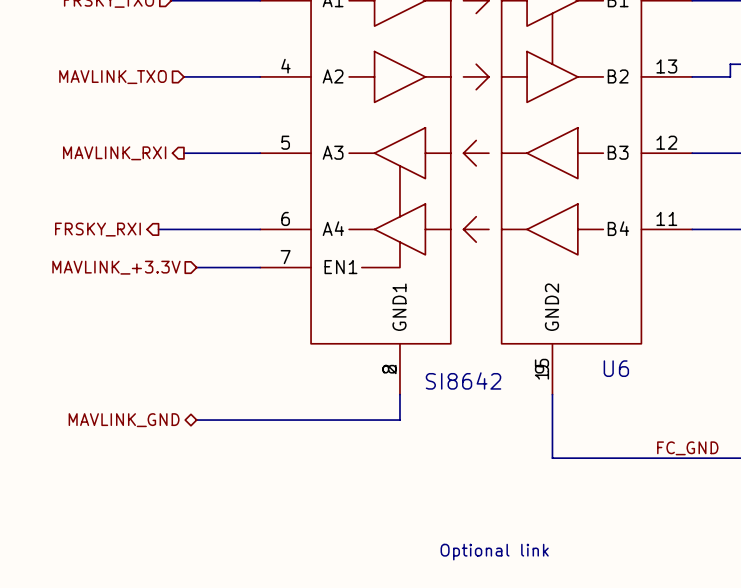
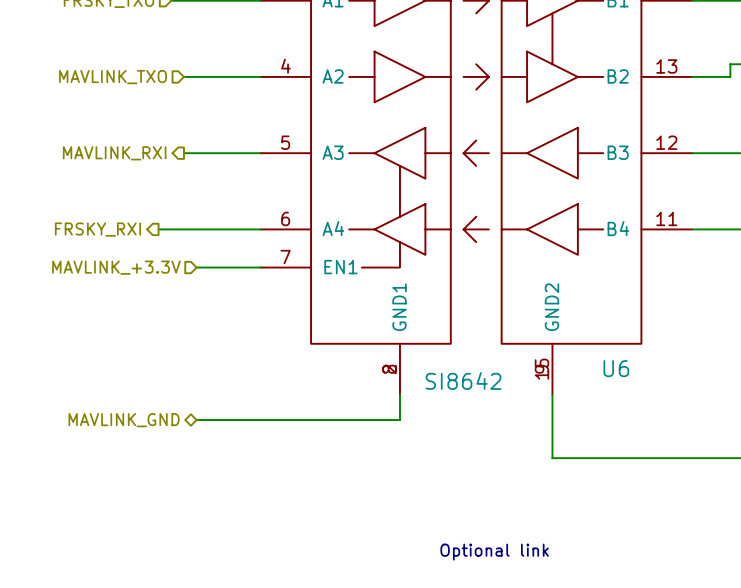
label: FC_GND (687, 448) -> none

